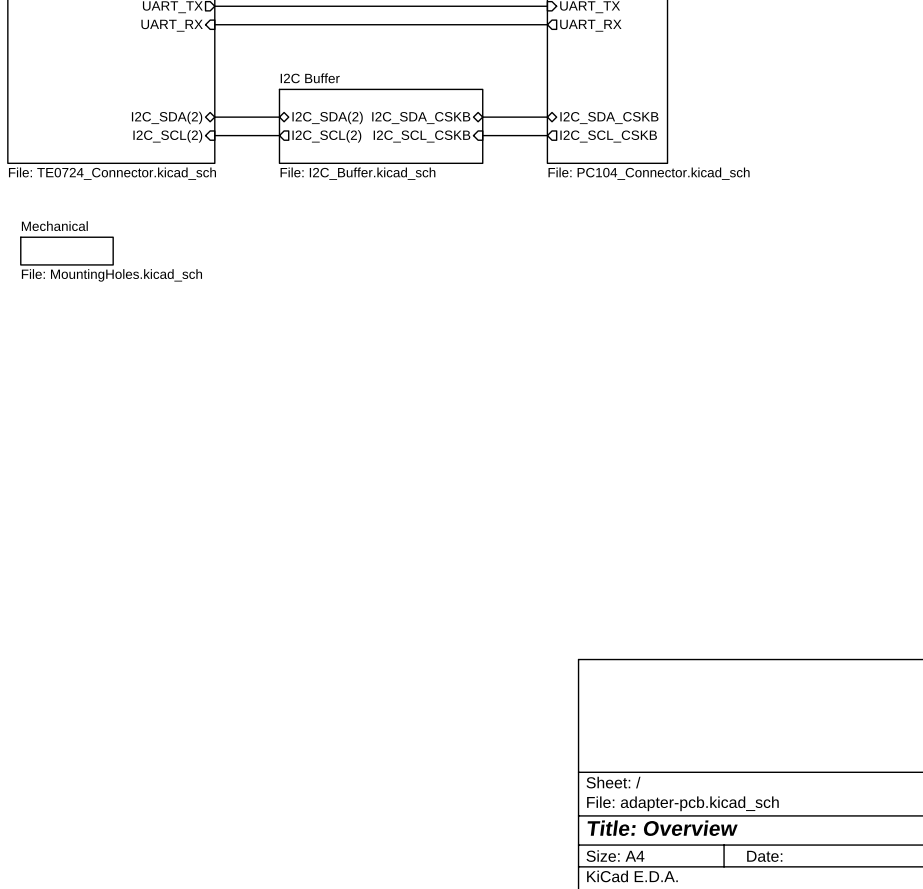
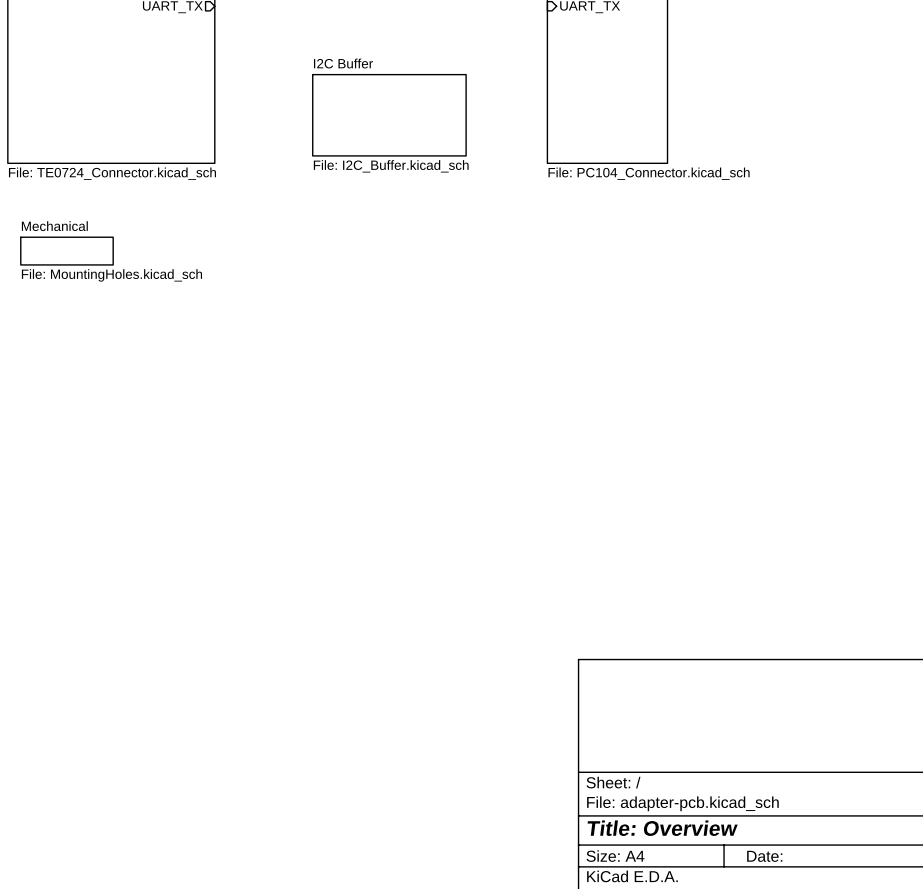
wire: (214, 6) (547, 6) -> none
wire: (214, 24) (547, 24) -> none
sheet pin: UART_RX (172, 25) -> none
sheet pin: UART_RX (590, 25) -> none
sheet I2C Buffer name position: I2C Buffer (310, 78) -> I2C Buffer (343, 63)
sheet I2C Buffer shape: [278, 88, 484, 164] -> [312, 74, 467, 157]
sheet pin: I2C_SDA(2) (167, 117) -> none
wire: (214, 117) (279, 117) -> none
sheet pin: I2C_SDA(2) (327, 117) -> none
wire: (482, 117) (547, 117) -> none
sheet pin: I2C_SDA_CSKB (421, 118) -> none
sheet pin: I2C_SDA_CSKB (609, 118) -> none
wire: (214, 135) (279, 135) -> none
wire: (482, 135) (547, 135) -> none
sheet pin: I2C_SCL(2) (167, 136) -> none
sheet pin: I2C_SCL(2) (326, 136) -> none
sheet pin: I2C_SCL_CSKB (422, 136) -> none
sheet pin: I2C_SCL_CSKB (608, 136) -> none
sheet I2C Buffer value position: File: I2C_Buffer.kicad_sch (357, 173) -> File: I2C_Buffer.kicad_sch (391, 166)

